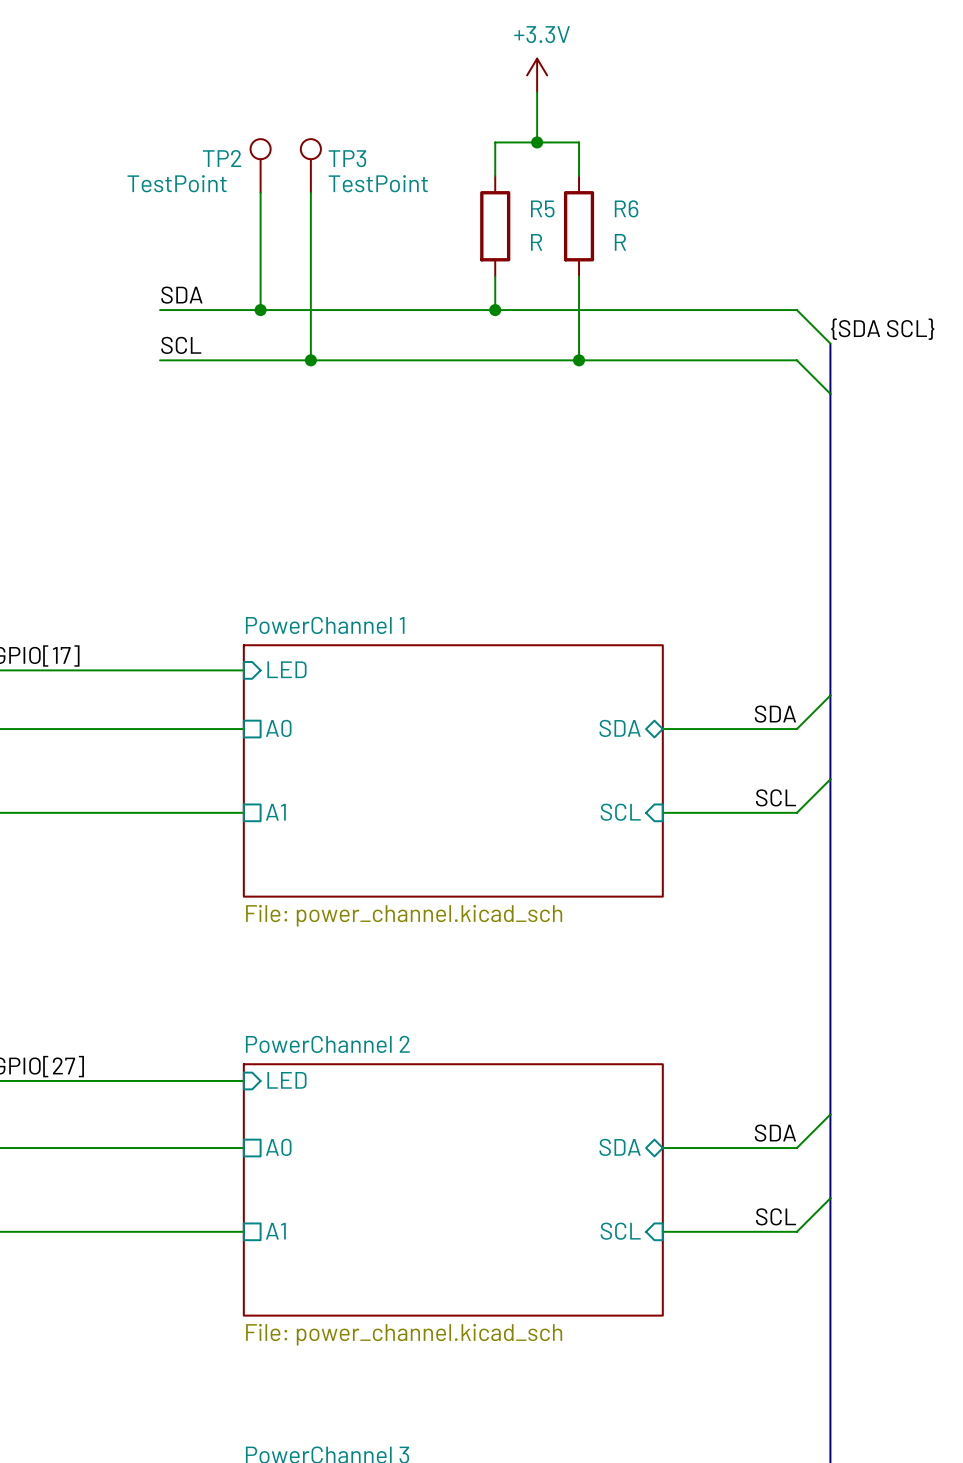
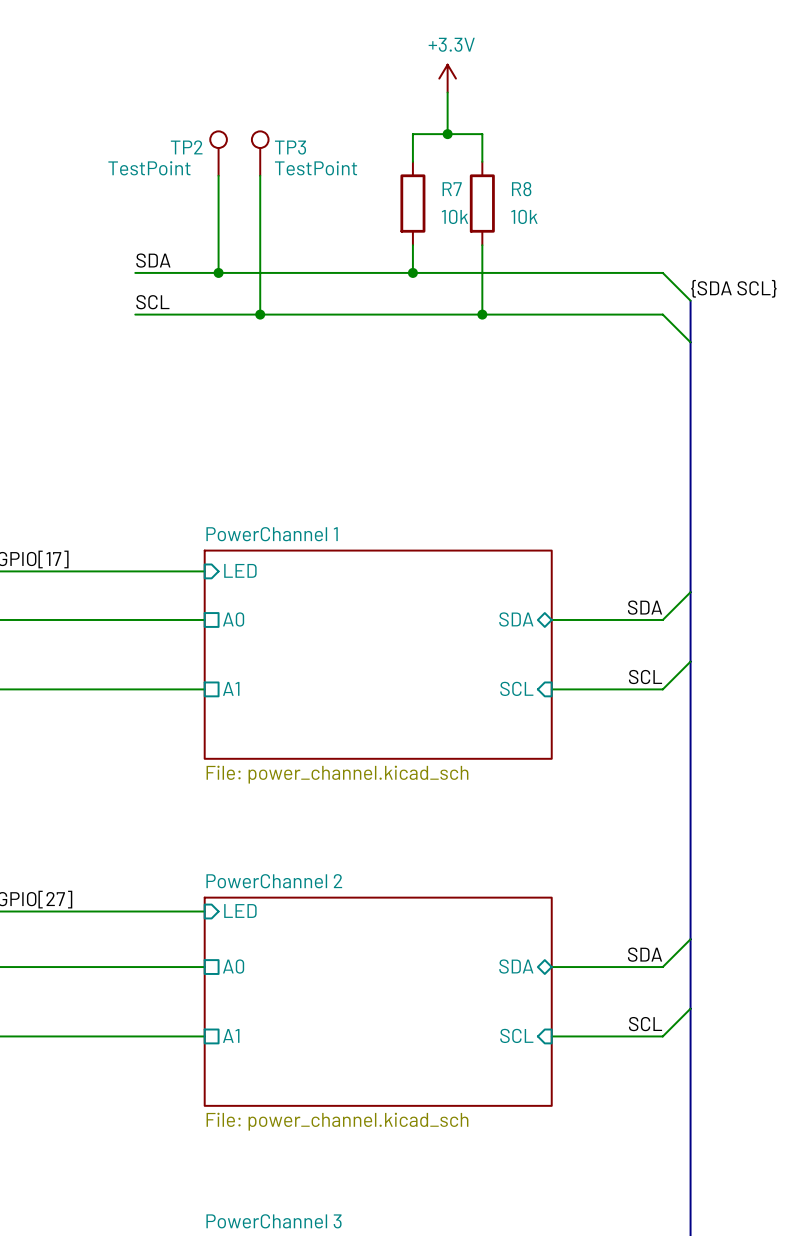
R5 name: R5 (542, 208) -> R7 (452, 189)
R6 name: R6 (626, 208) -> R8 (521, 189)
R5 value: R (536, 242) -> 10k (455, 216)
R6 value: R (620, 242) -> 10k (524, 216)

